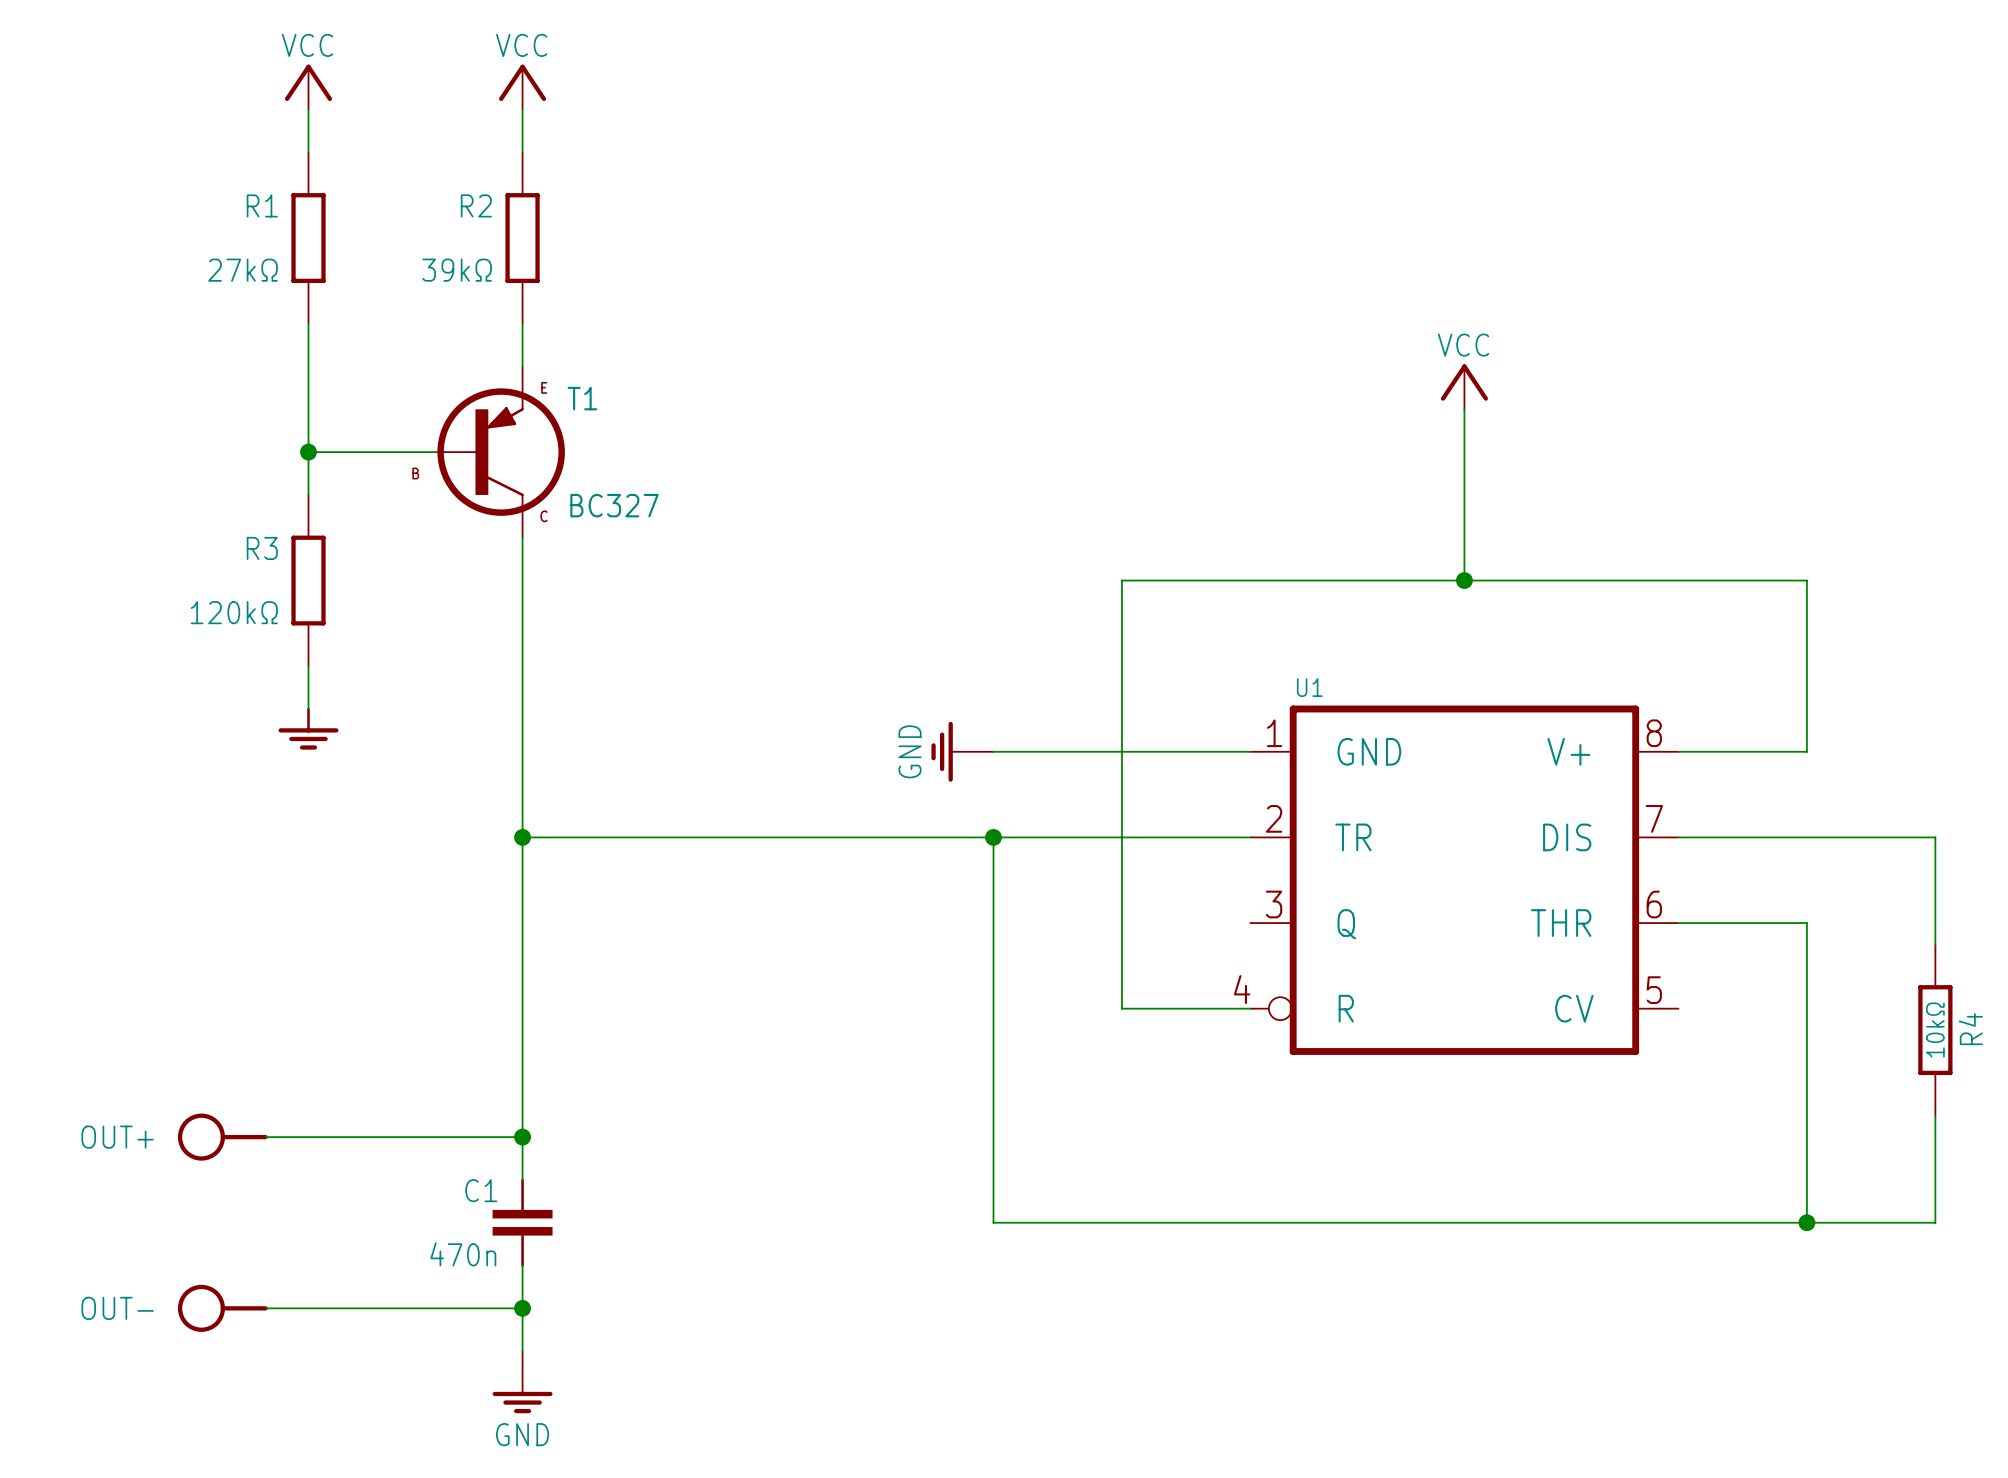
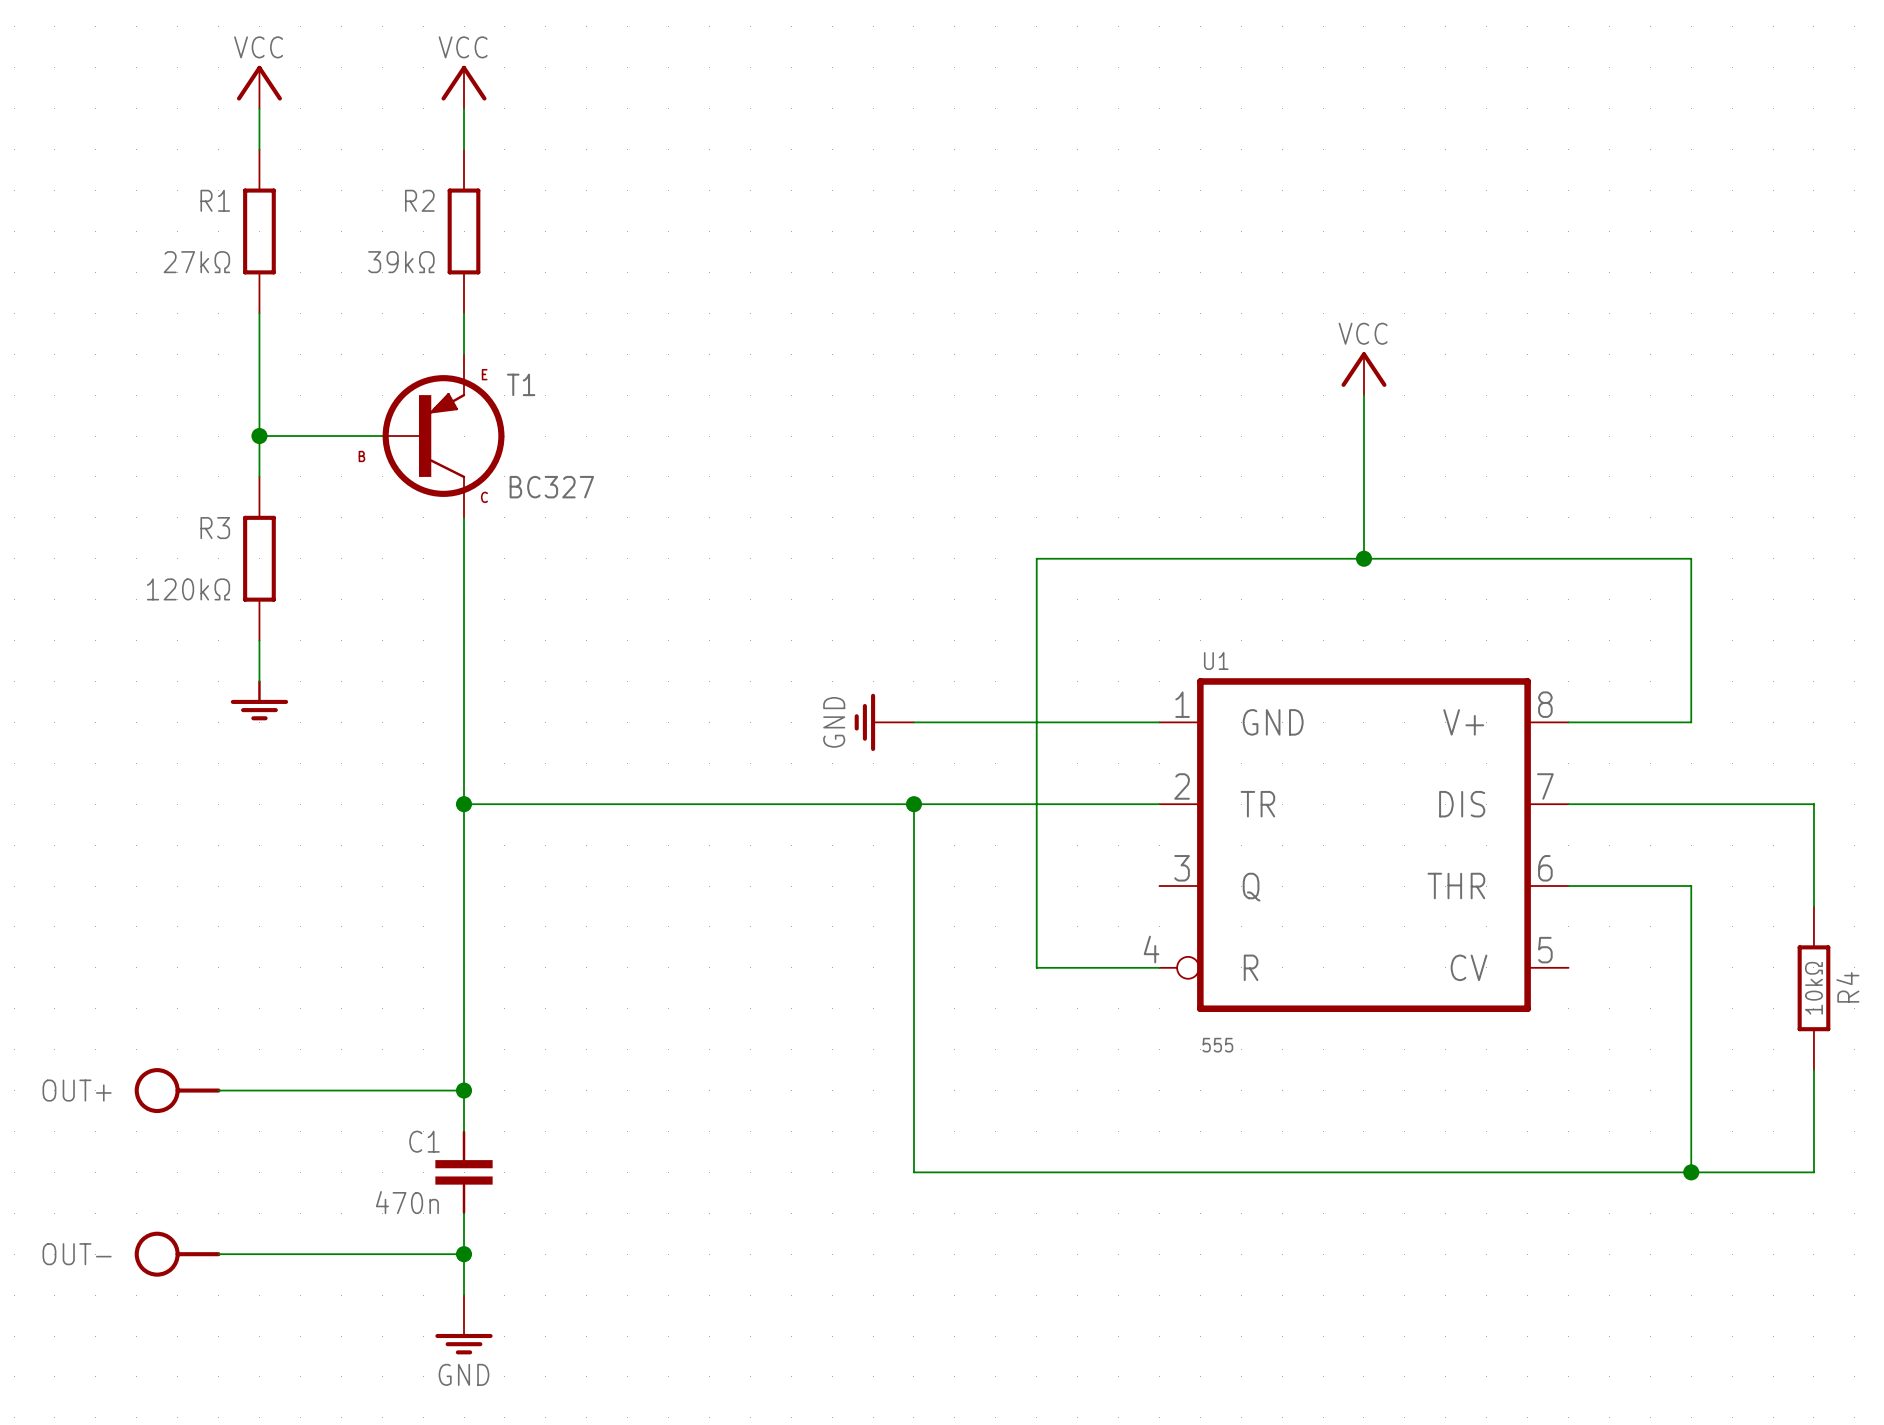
U1 value: none -> 555 (1217, 1045)

